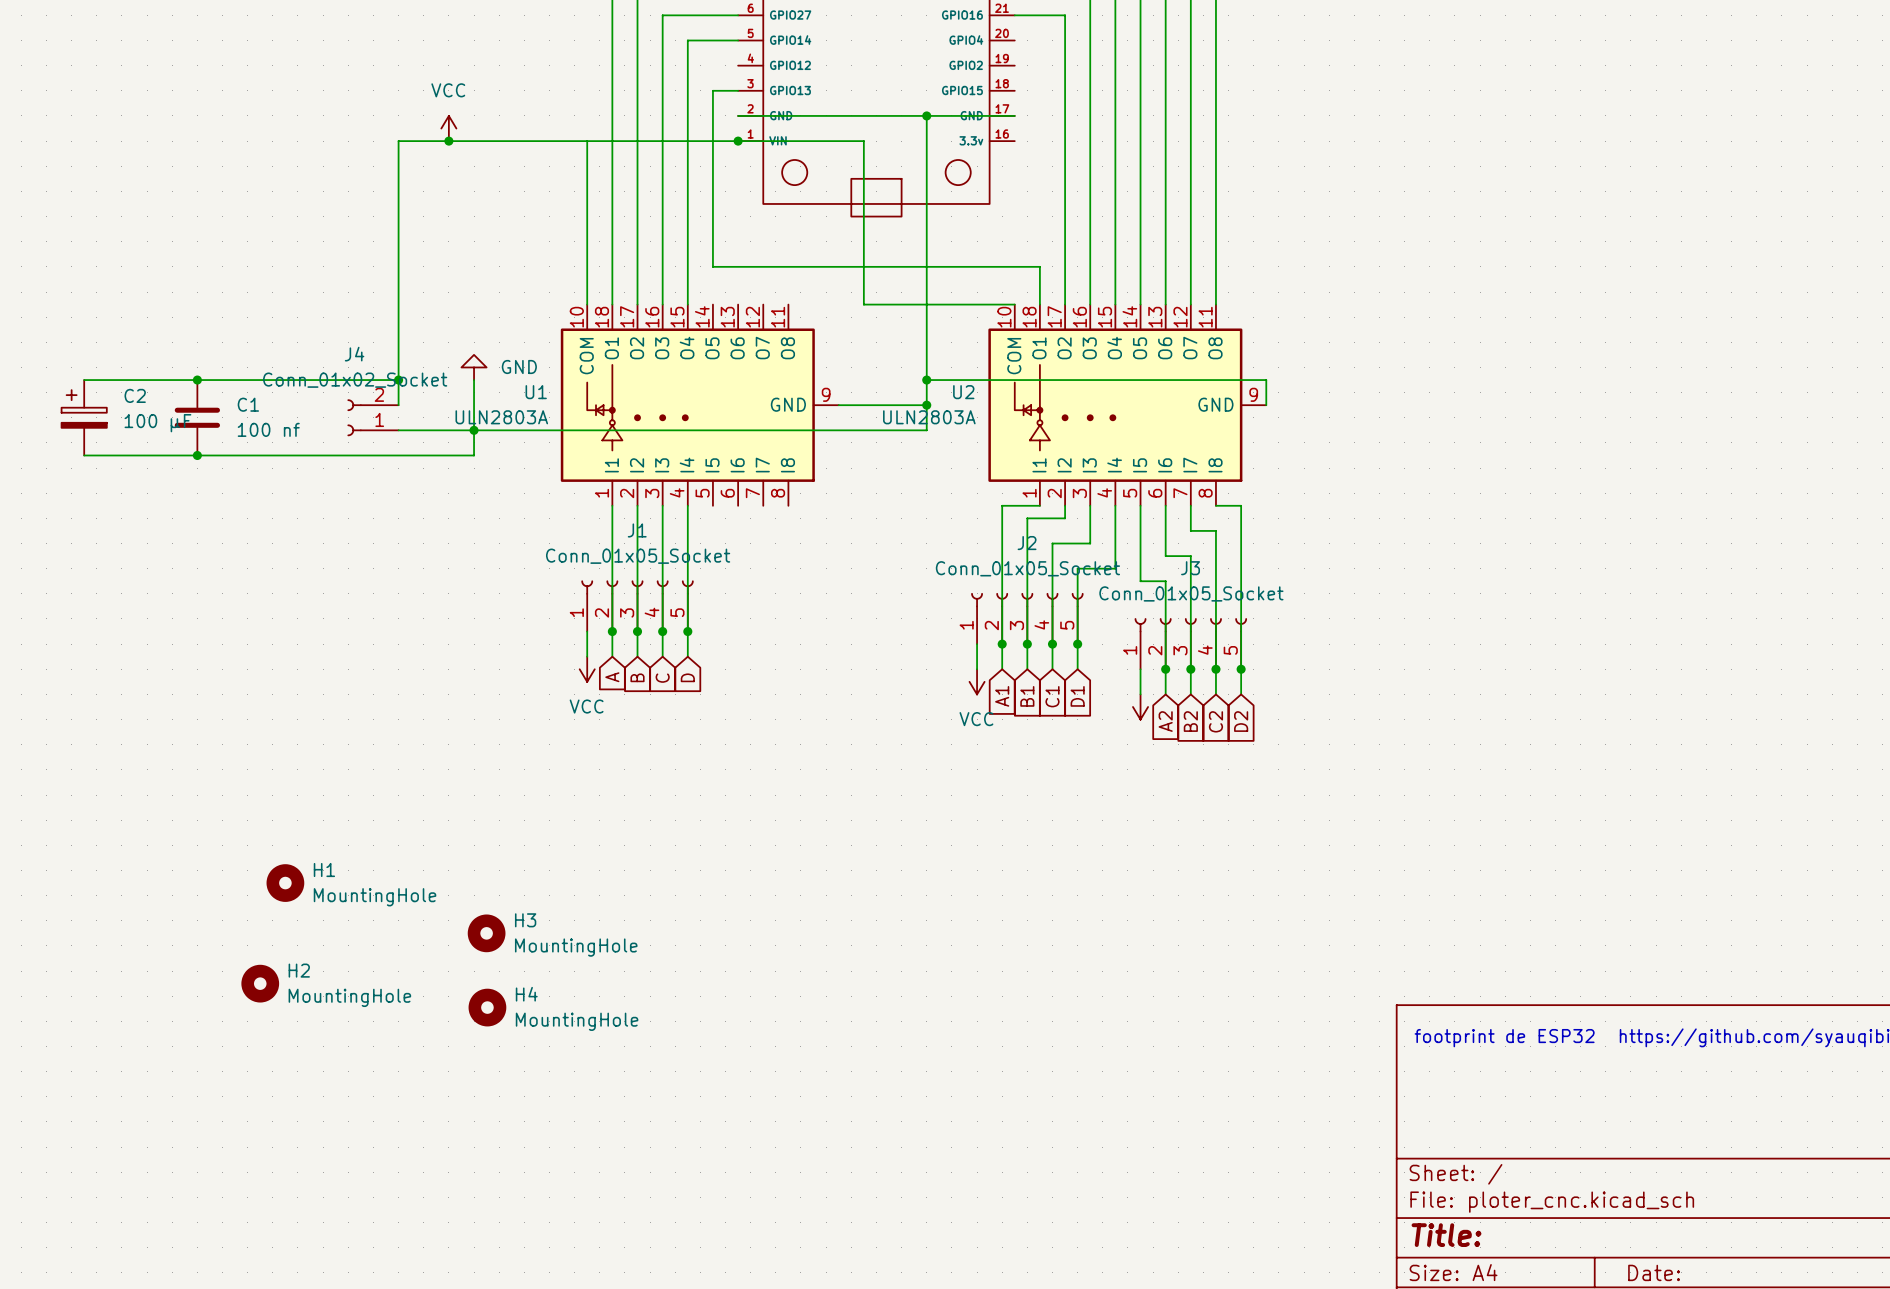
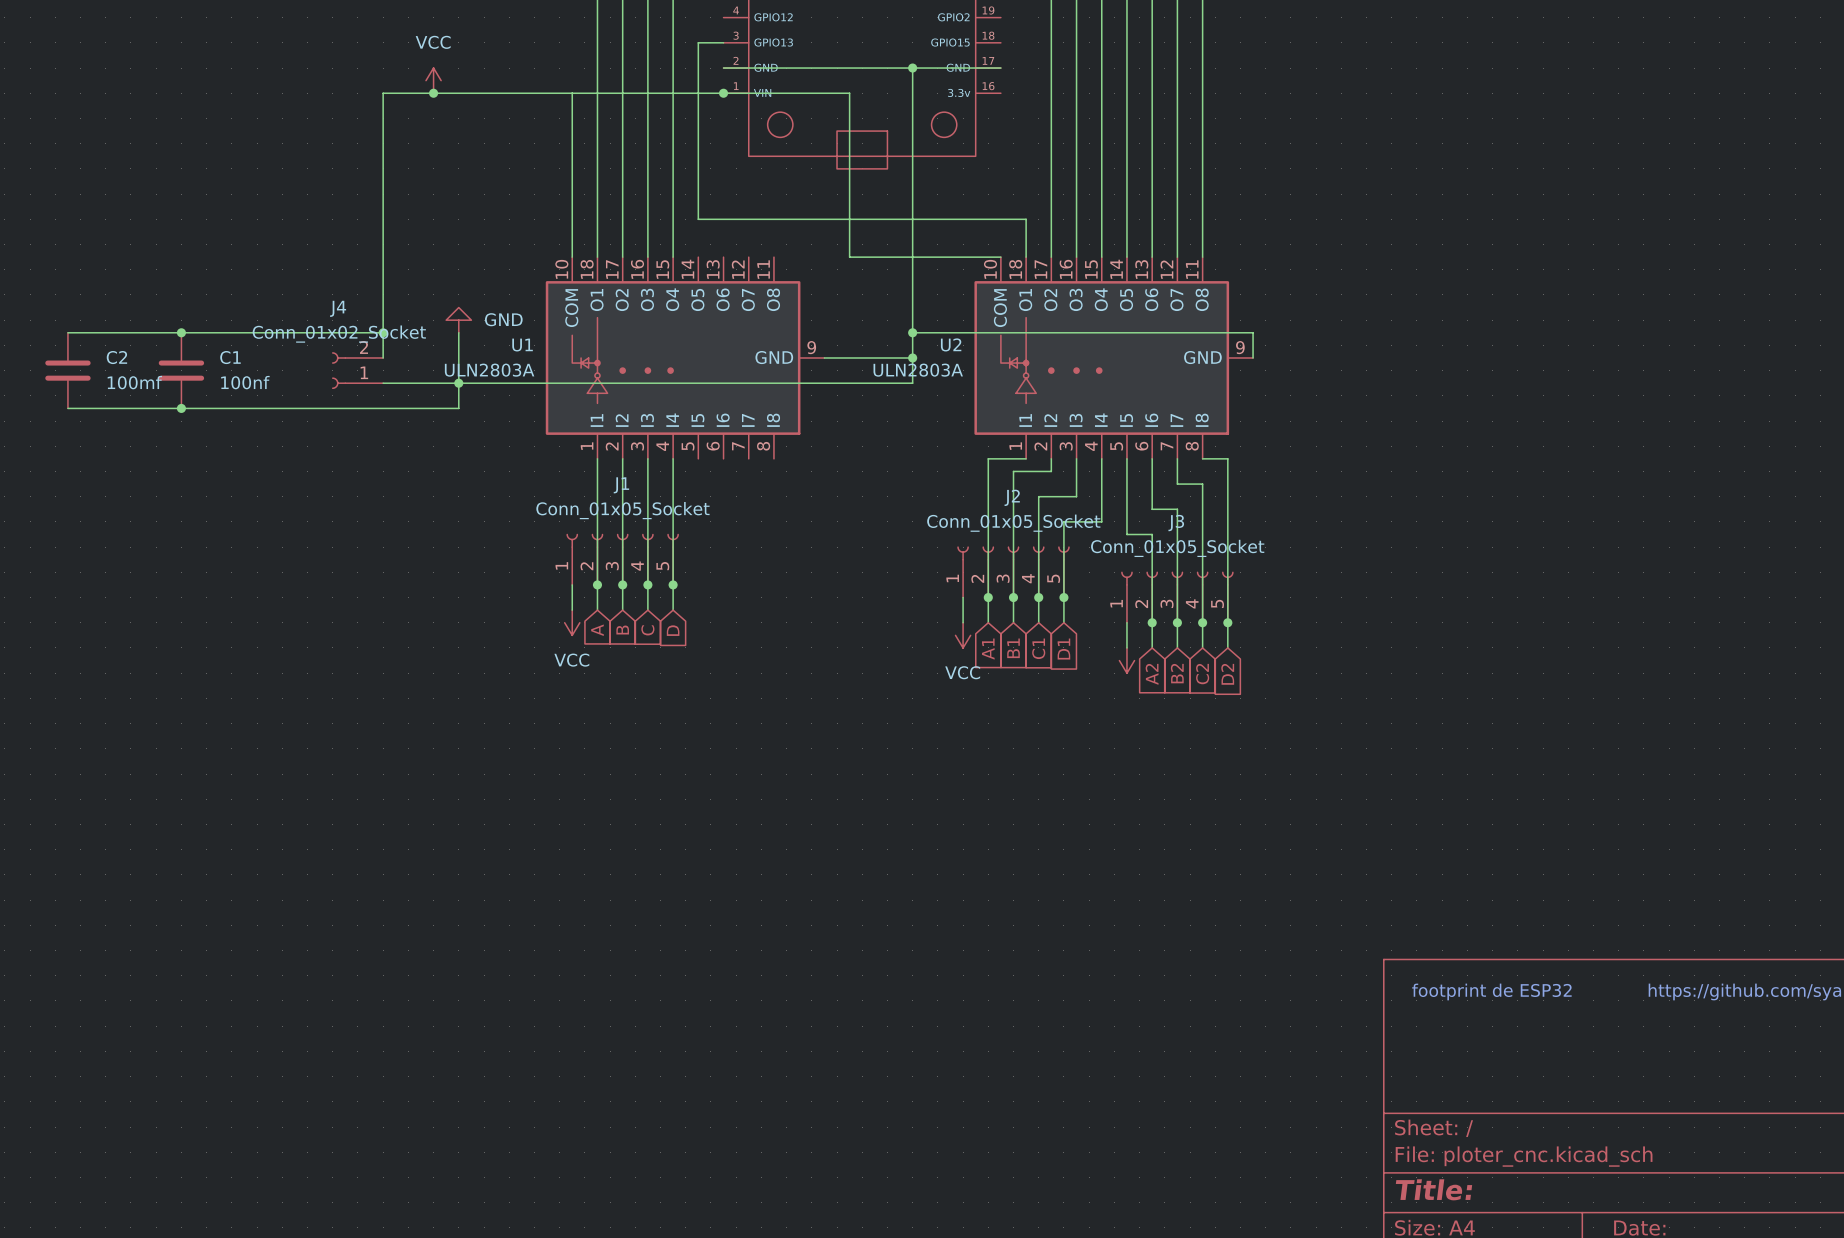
C2 symbol: [61, 380, 107, 456] -> [45, 332, 91, 409]
C2 value: 100 µF (157, 423) -> 100mf (134, 382)
C1 value: 100 nf (268, 429) -> 100nf (245, 382)
H1: MountingHole (285, 883) -> none
H3: MountingHole (486, 933) -> none
H2: MountingHole (260, 983) -> none
H4: MountingHole (487, 1007) -> none

